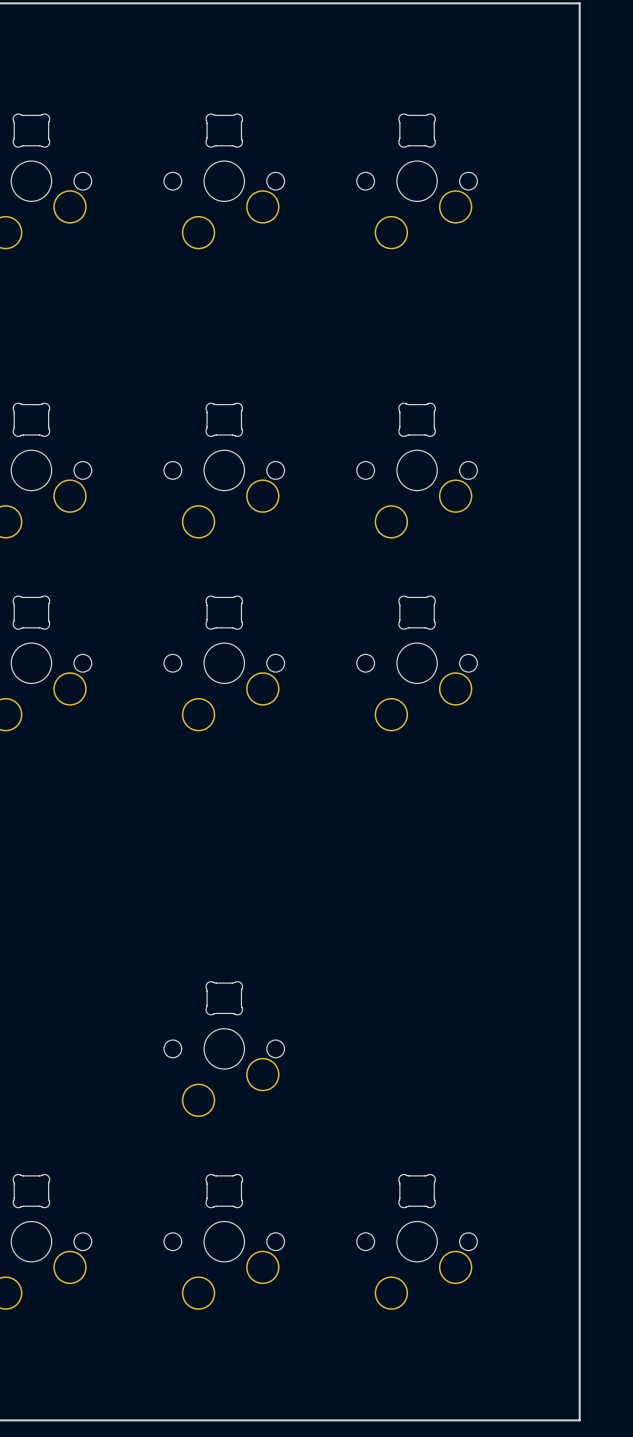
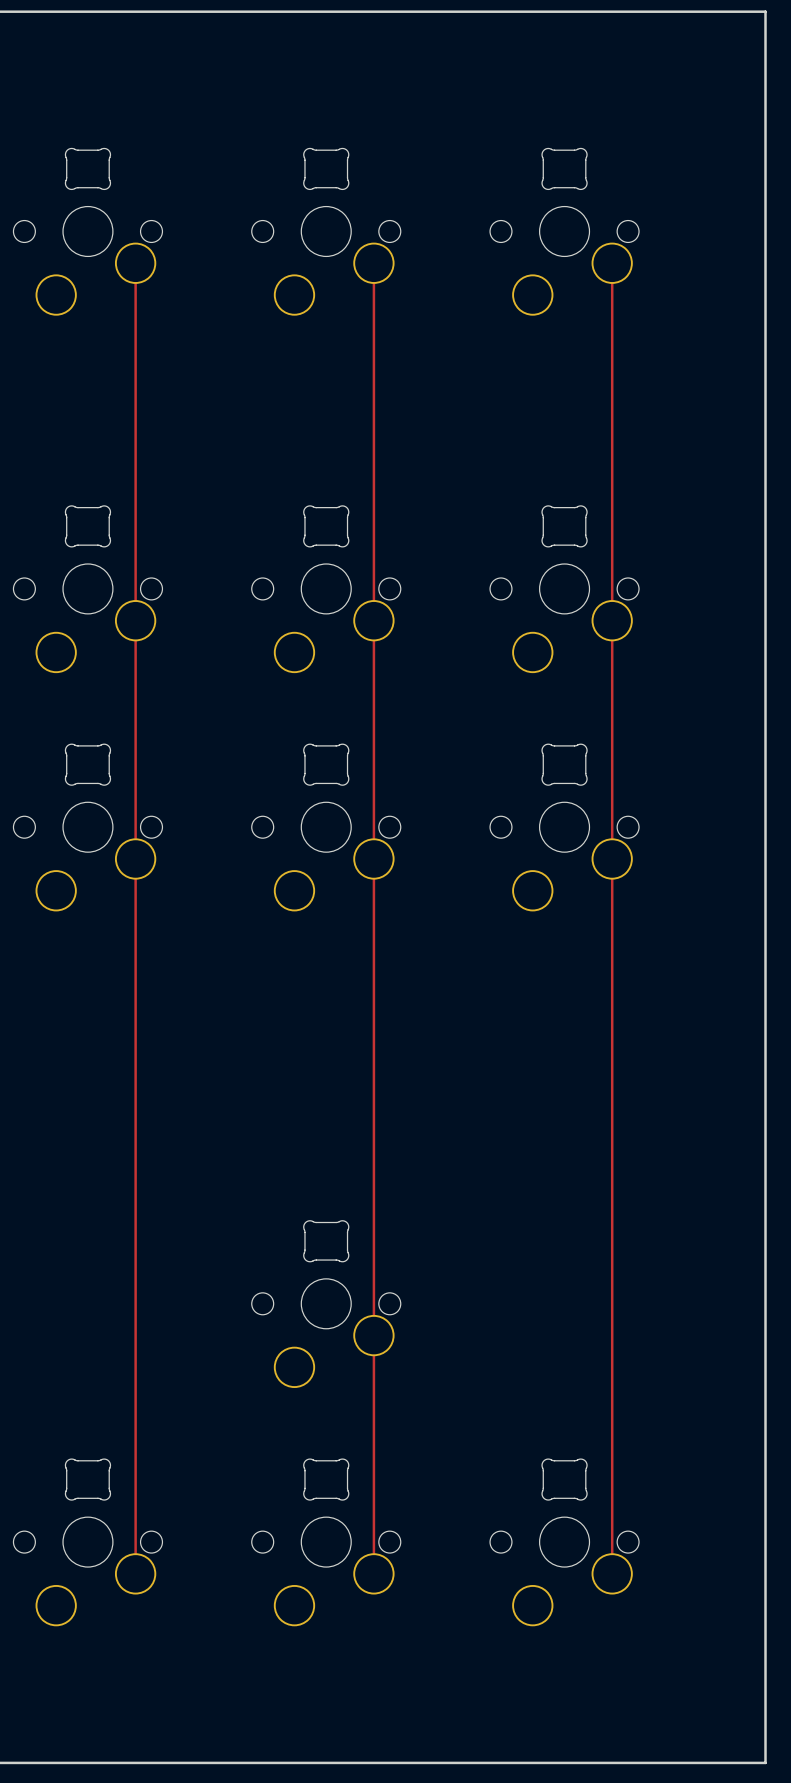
track: none -> (135, 263) (135, 1573)
track: none -> (373, 263) (373, 1573)
track: none -> (612, 263) (612, 1573)

